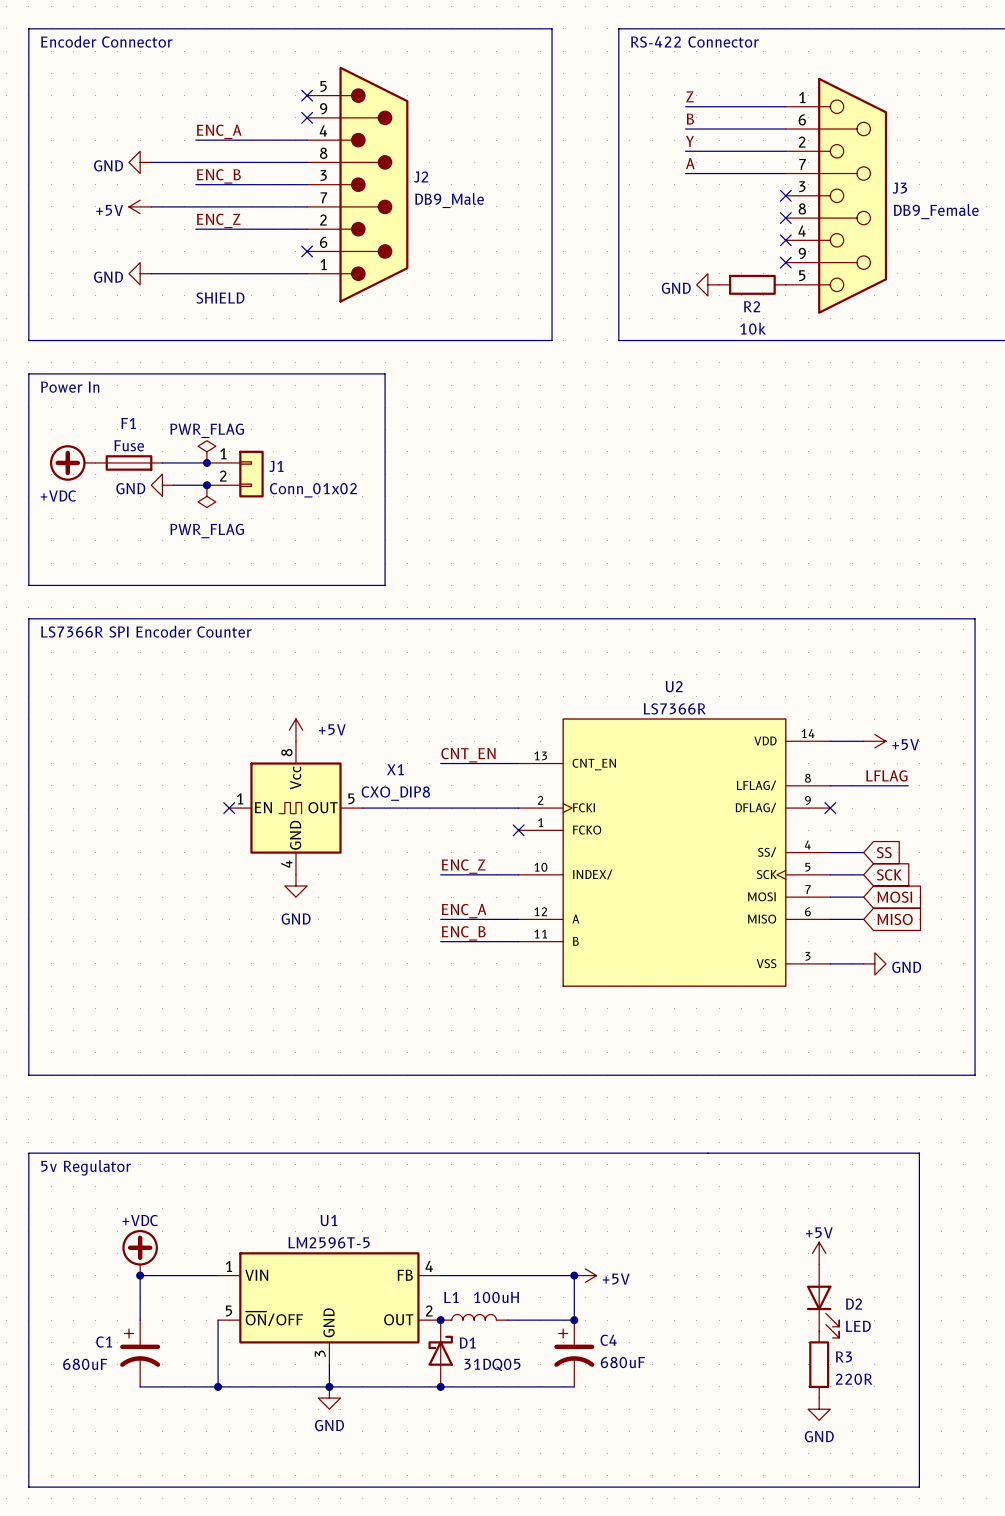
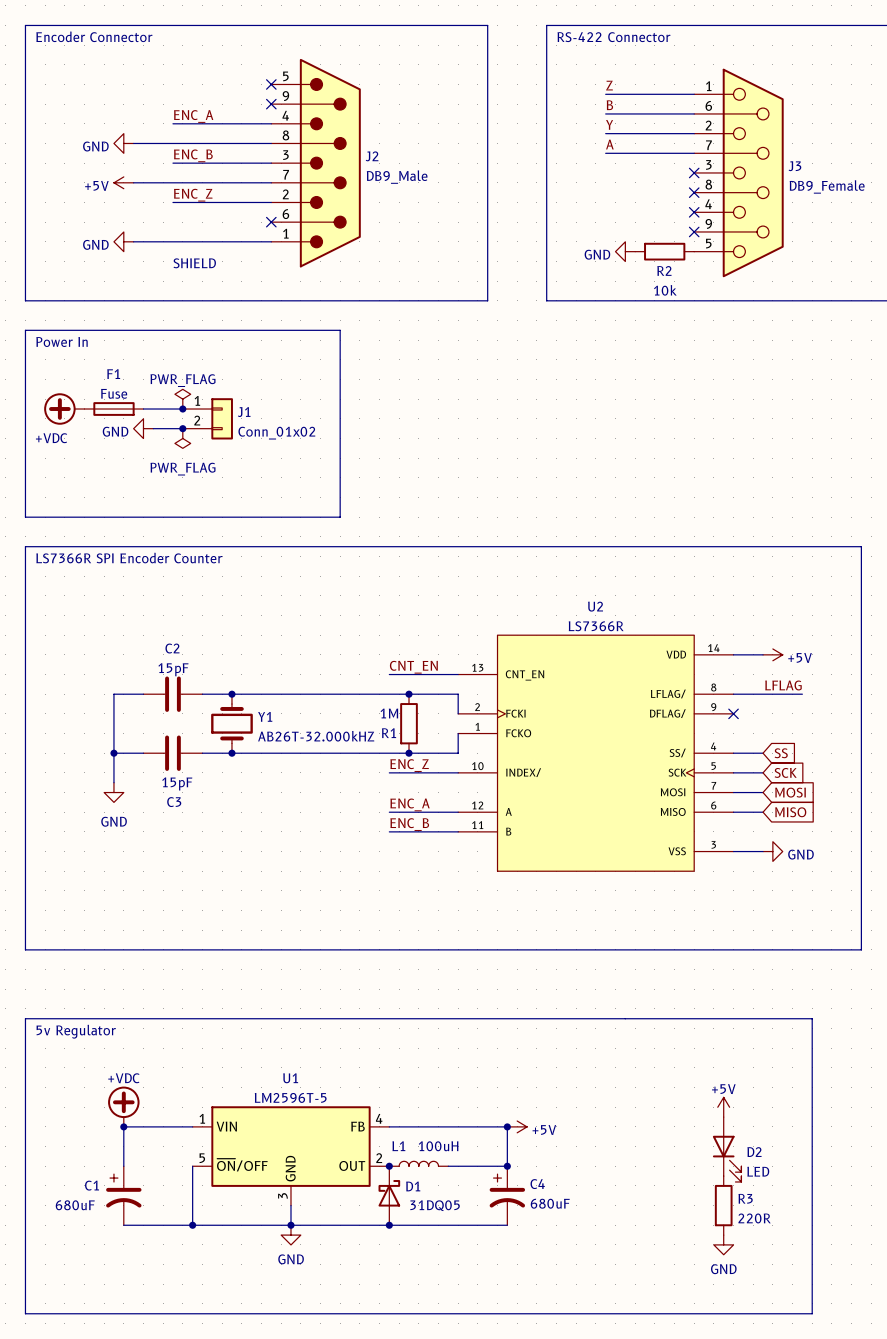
power symbol: +5V (295, 730) -> none
wire: none -> (143, 694) (113, 694) (113, 782)
C2: none -> 15pF (172, 694)
junction: none -> (231, 694)
junction: none -> (409, 694)
no-connect mark: (229, 808) -> none
X1: CXO_DIP8 (295, 808) -> none
wire: (362, 808) (518, 808) -> (202, 694) (458, 694) (458, 713)
Y1: none -> AB26T-32.000kHZ (231, 723)
R1: none -> 1M (409, 723)
wire: none -> (458, 733) (458, 753) (202, 753)
no-connect mark: (518, 830) -> none
wire: none -> (113, 753) (143, 753)
junction: none -> (113, 753)
C3: none -> 15pF (172, 753)
junction: none -> (231, 753)
junction: none -> (409, 753)
power symbol position: GND (295, 885) -> GND (113, 792)

